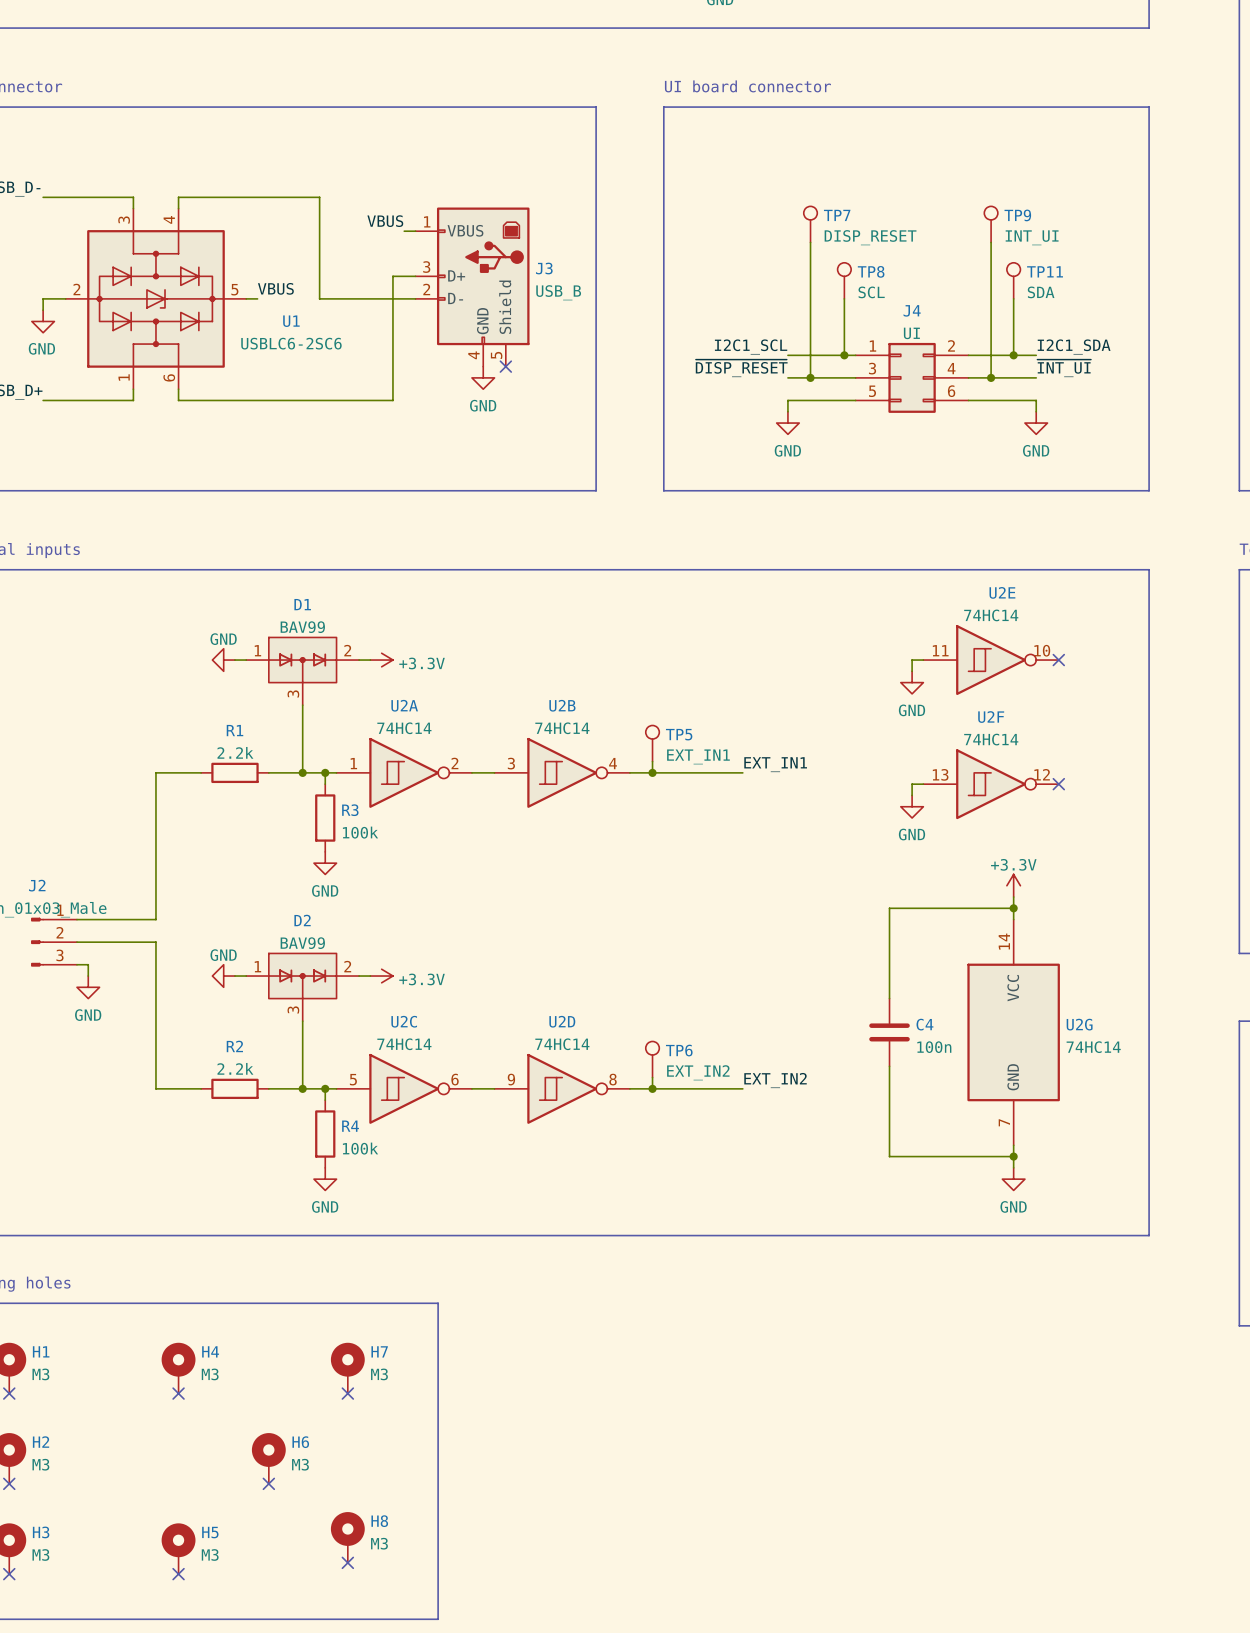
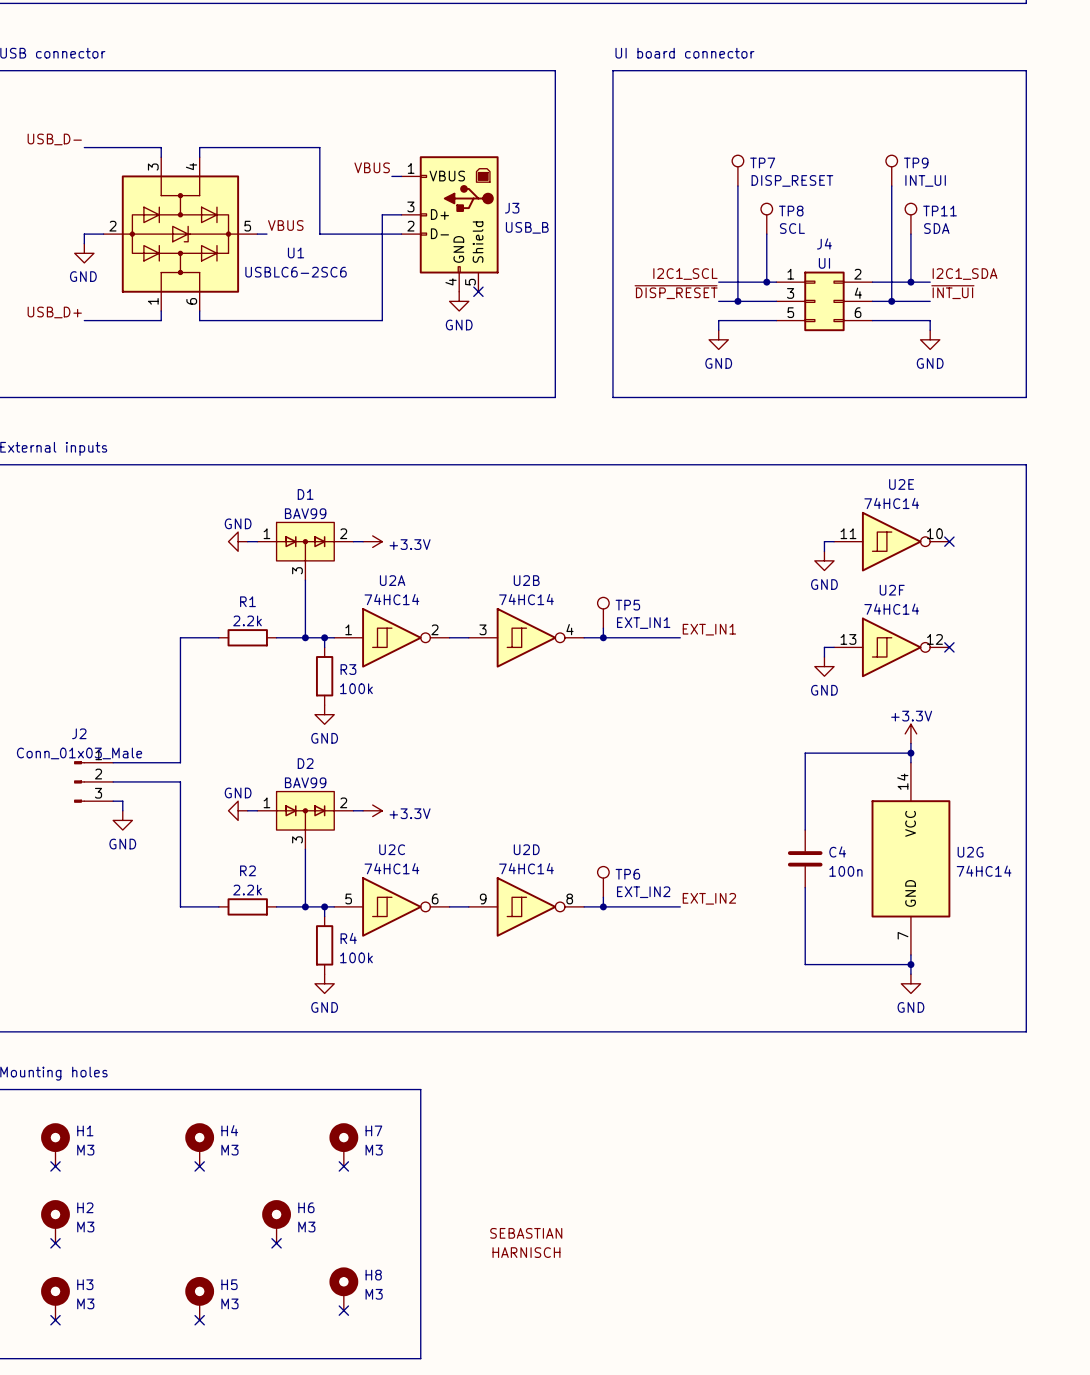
part: none -> (526, 1242)

